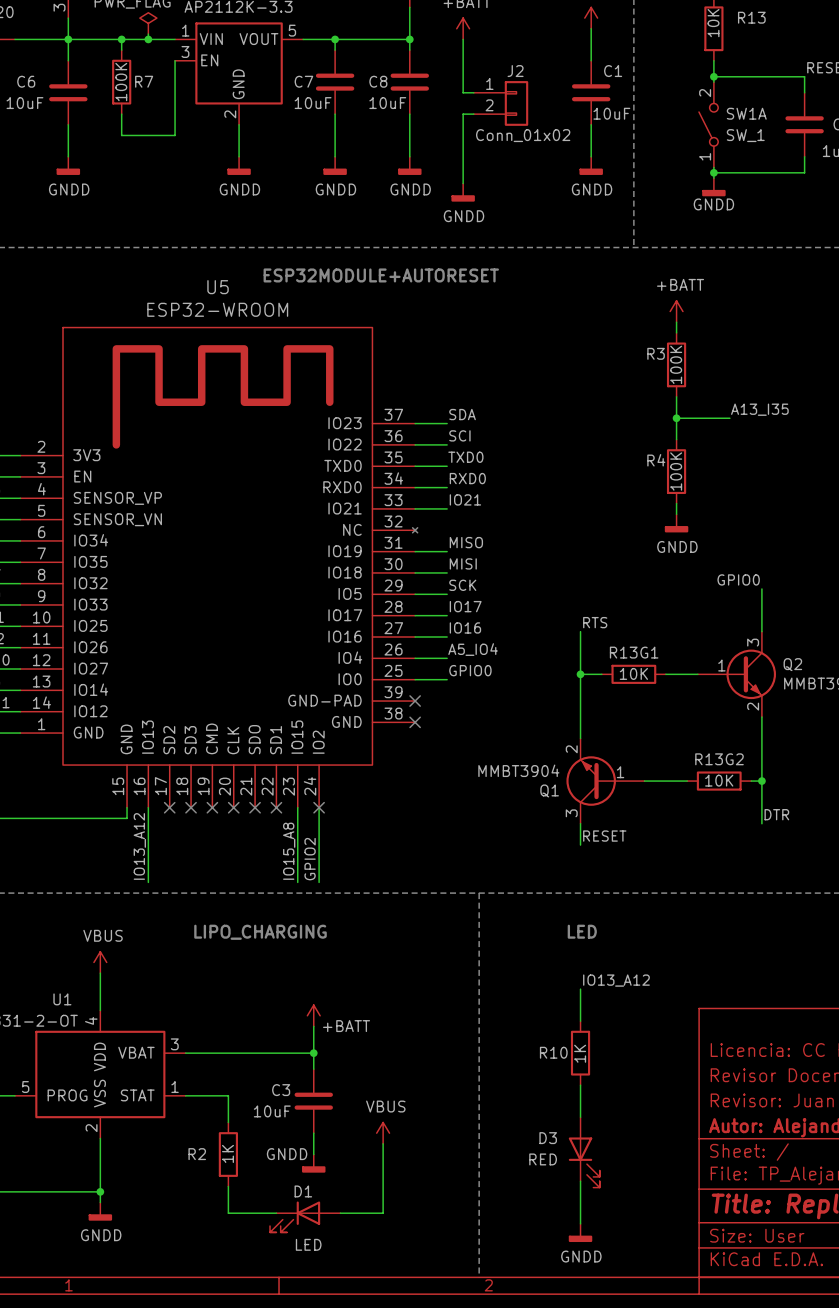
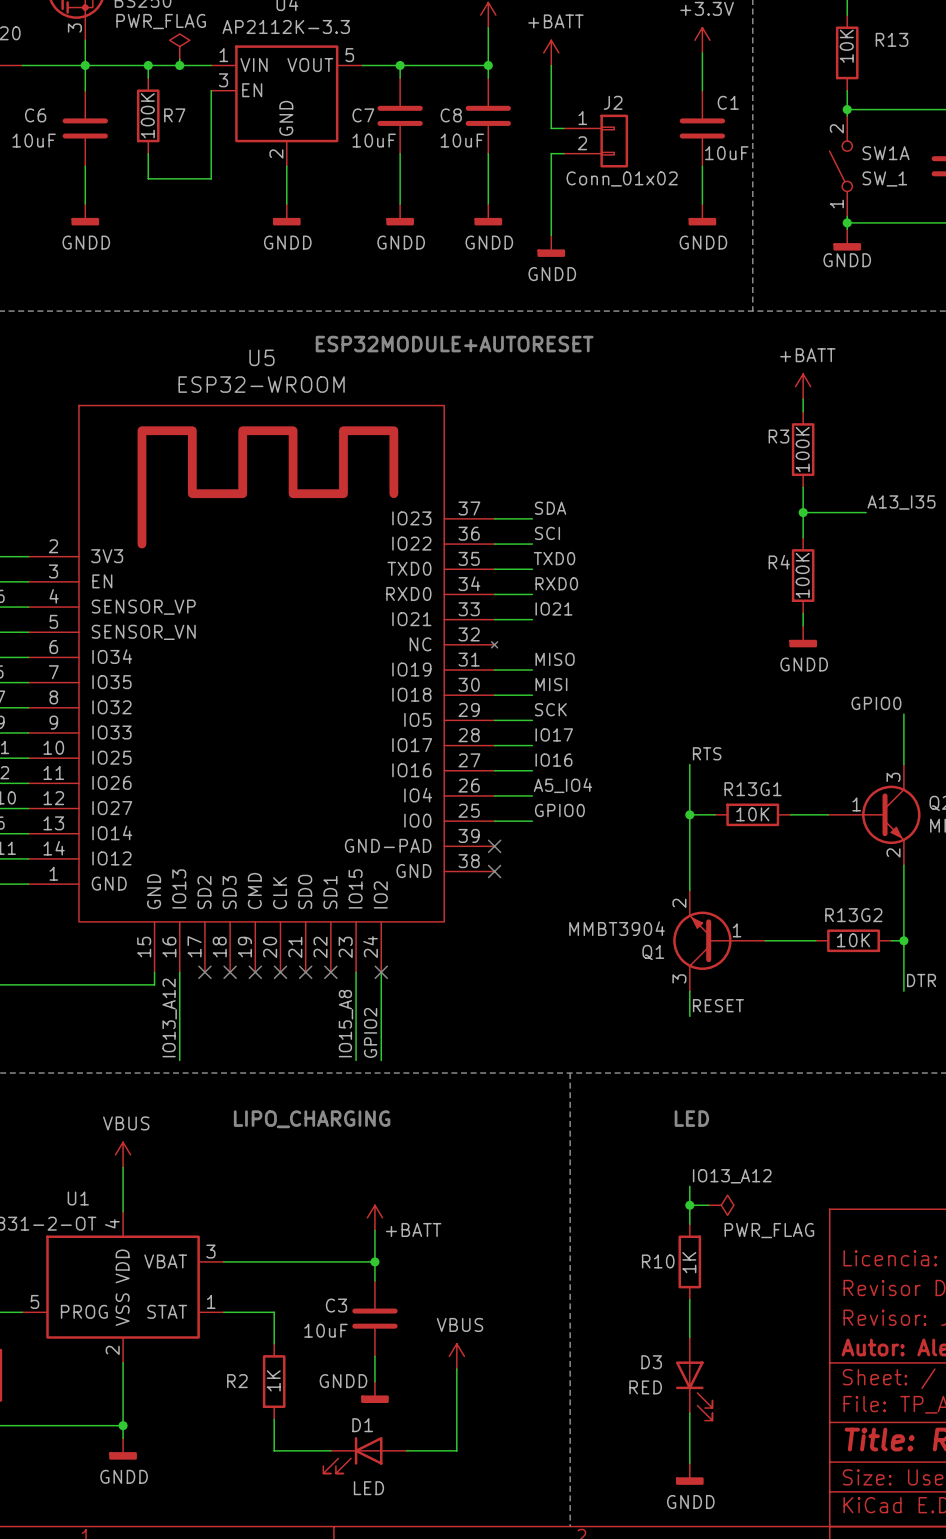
wire: none -> (689, 1205) (708, 1205)
junction: none -> (689, 1205)
power symbol: none -> PWR_FLAG (721, 1205)

